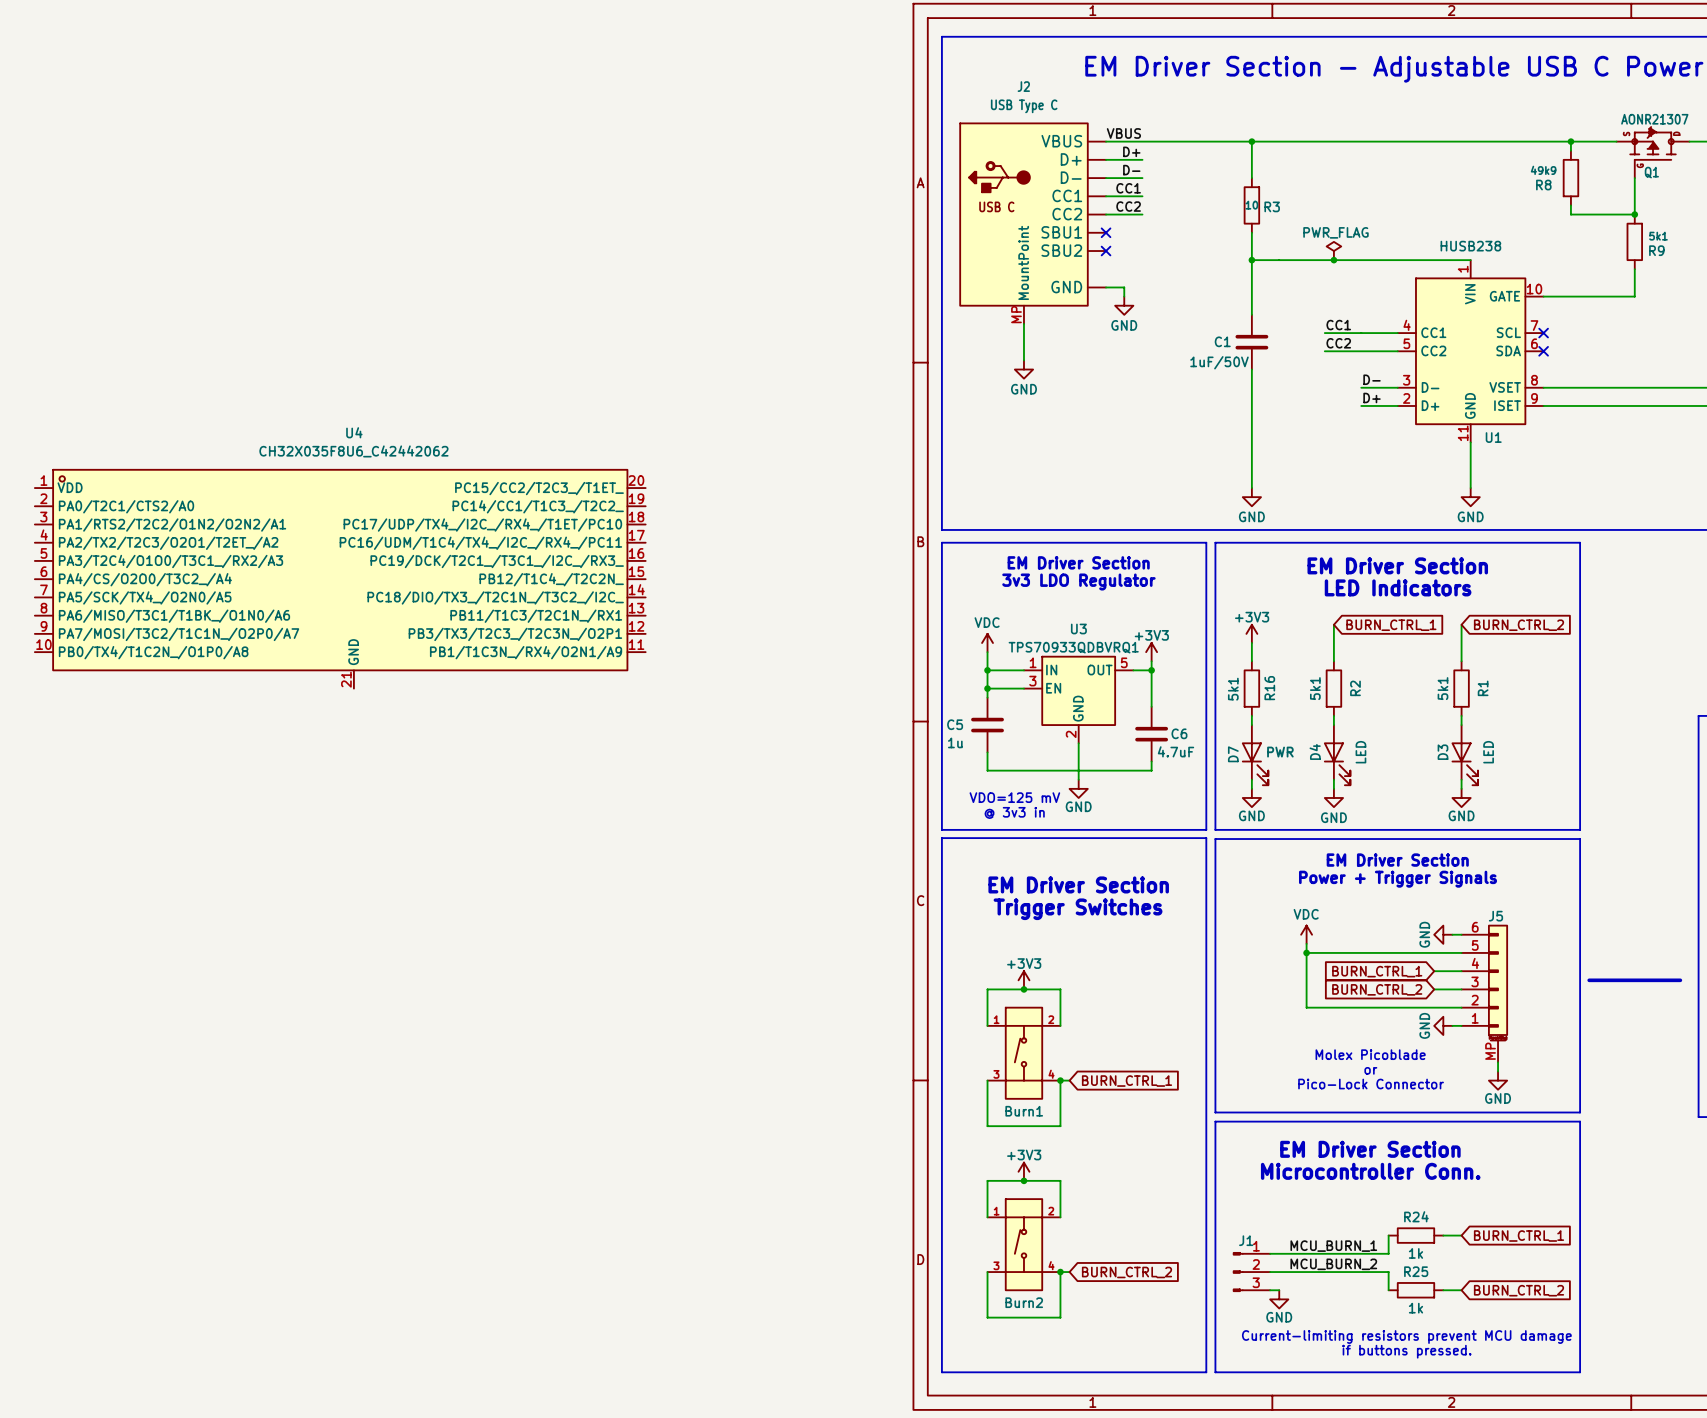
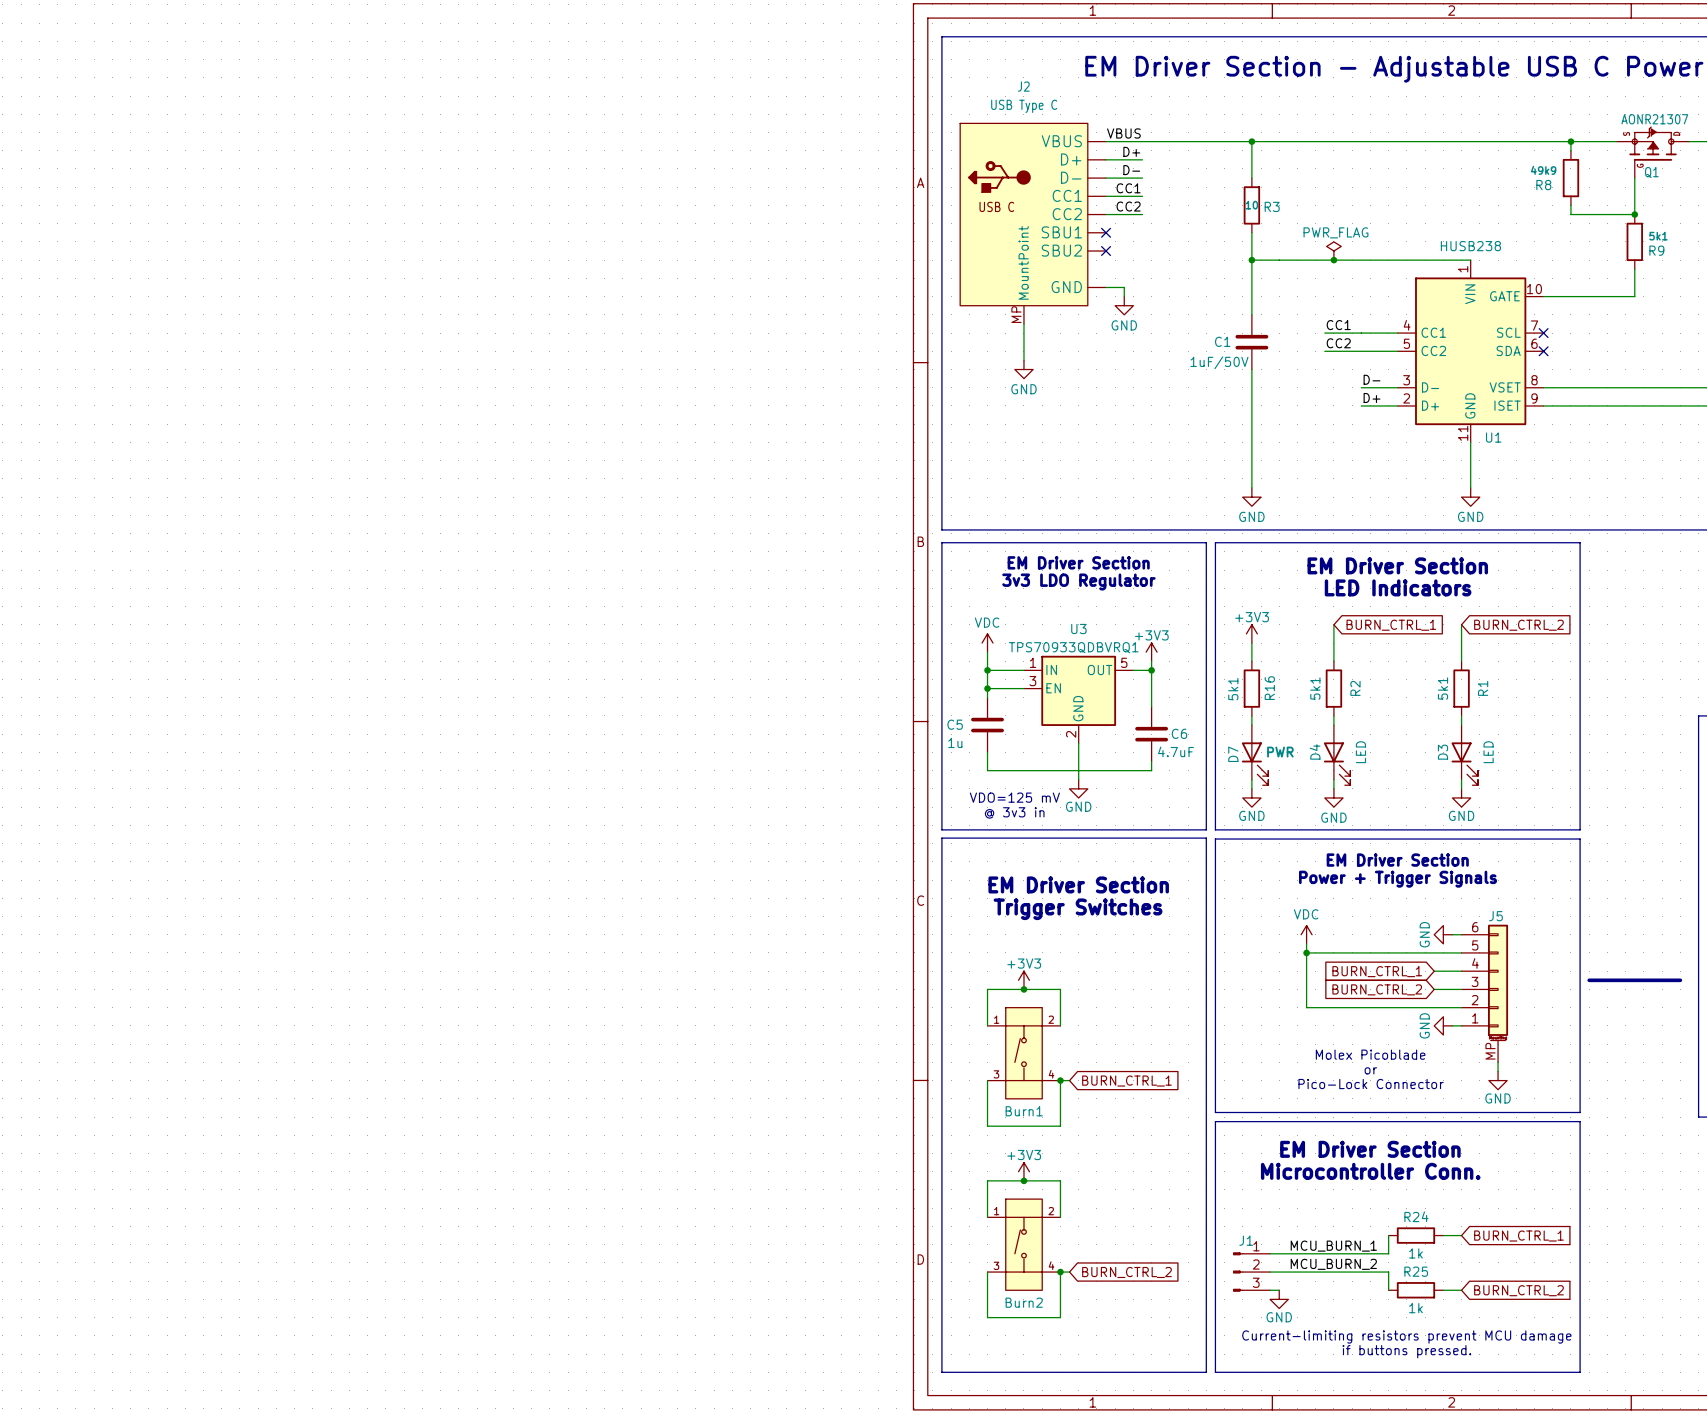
U4: CH32X035F8U6_C42442062 (340, 579) -> none

